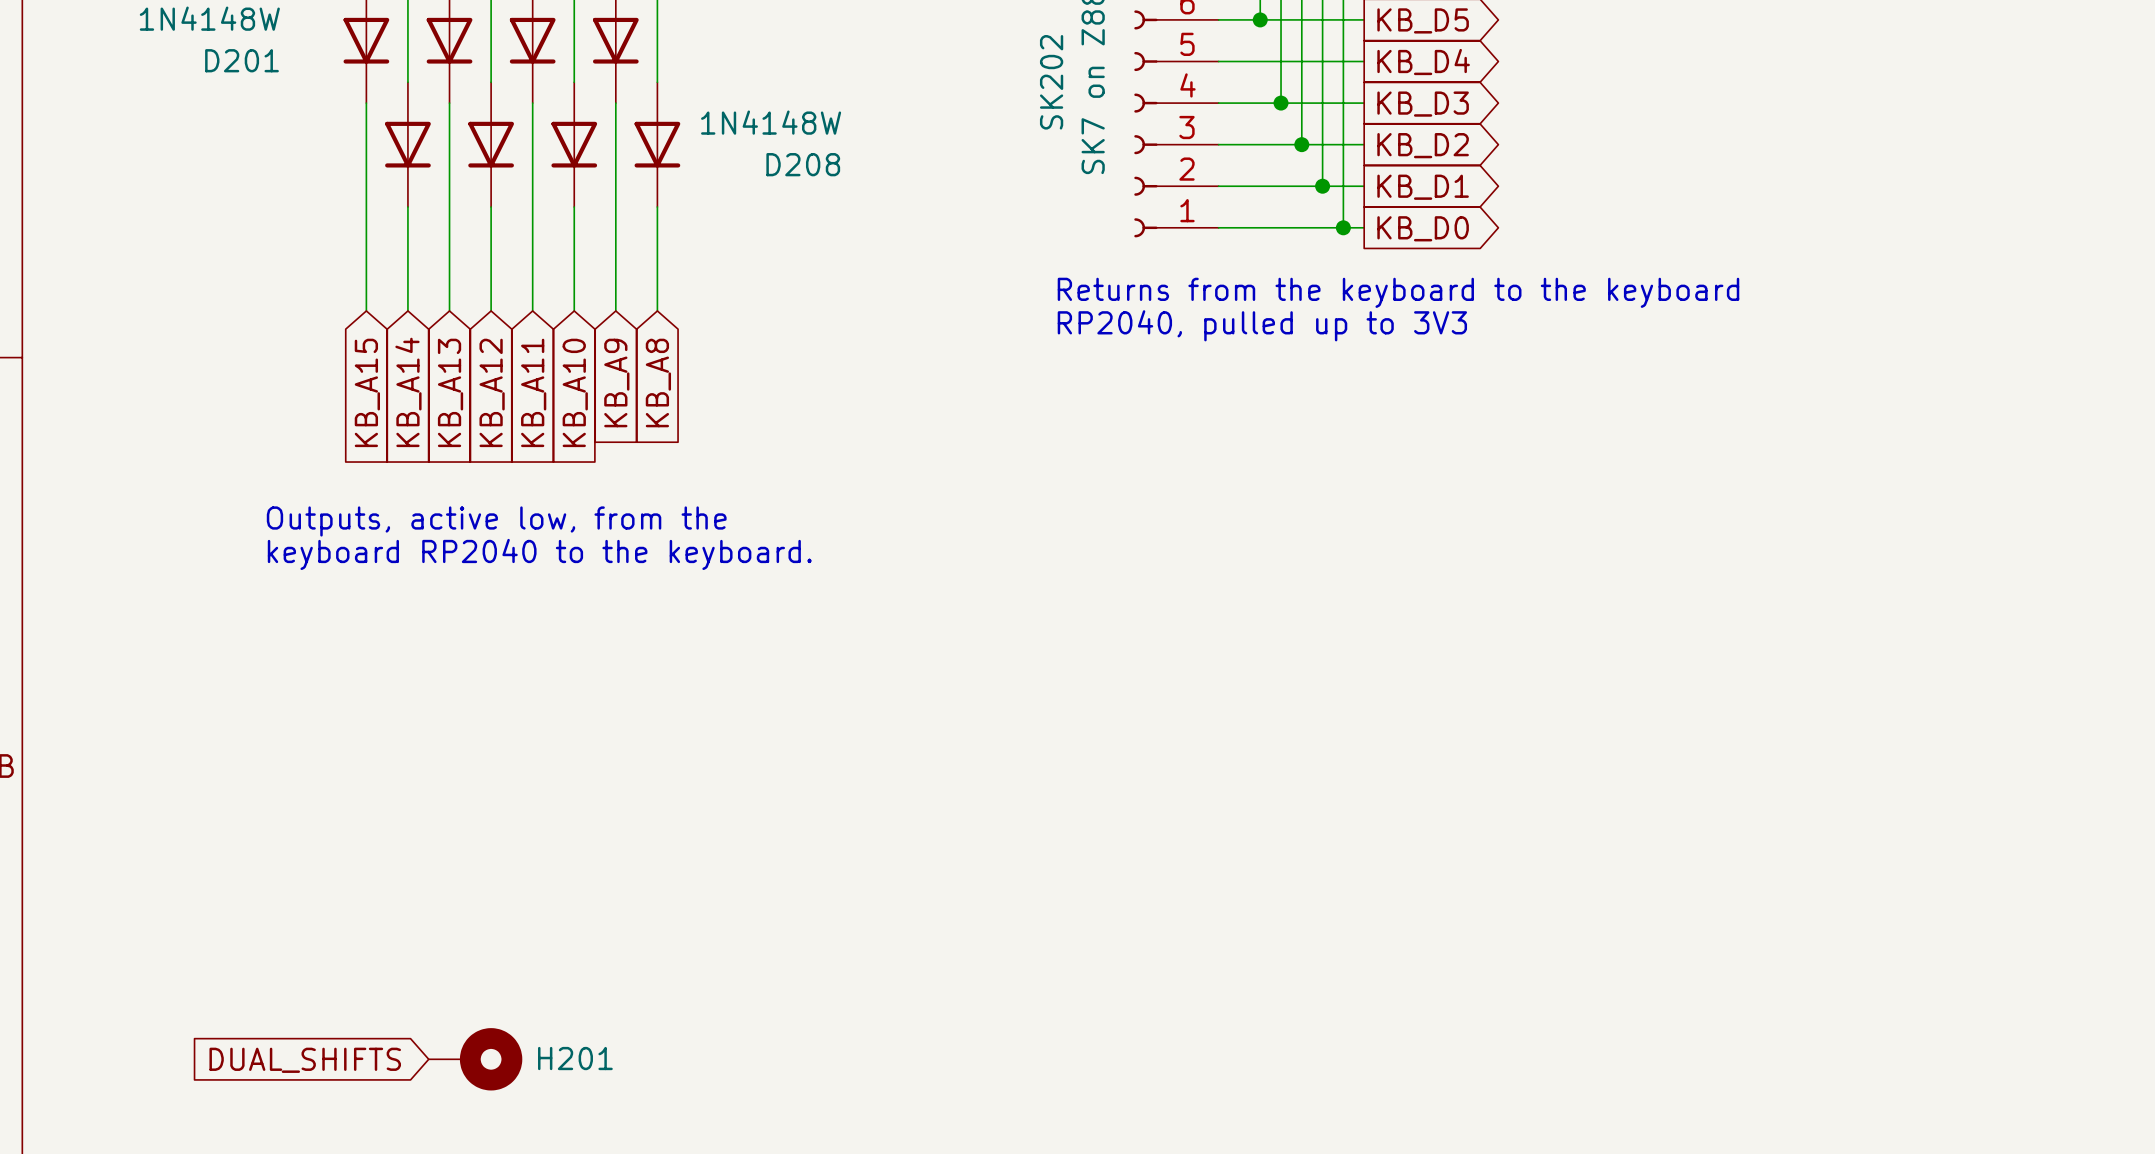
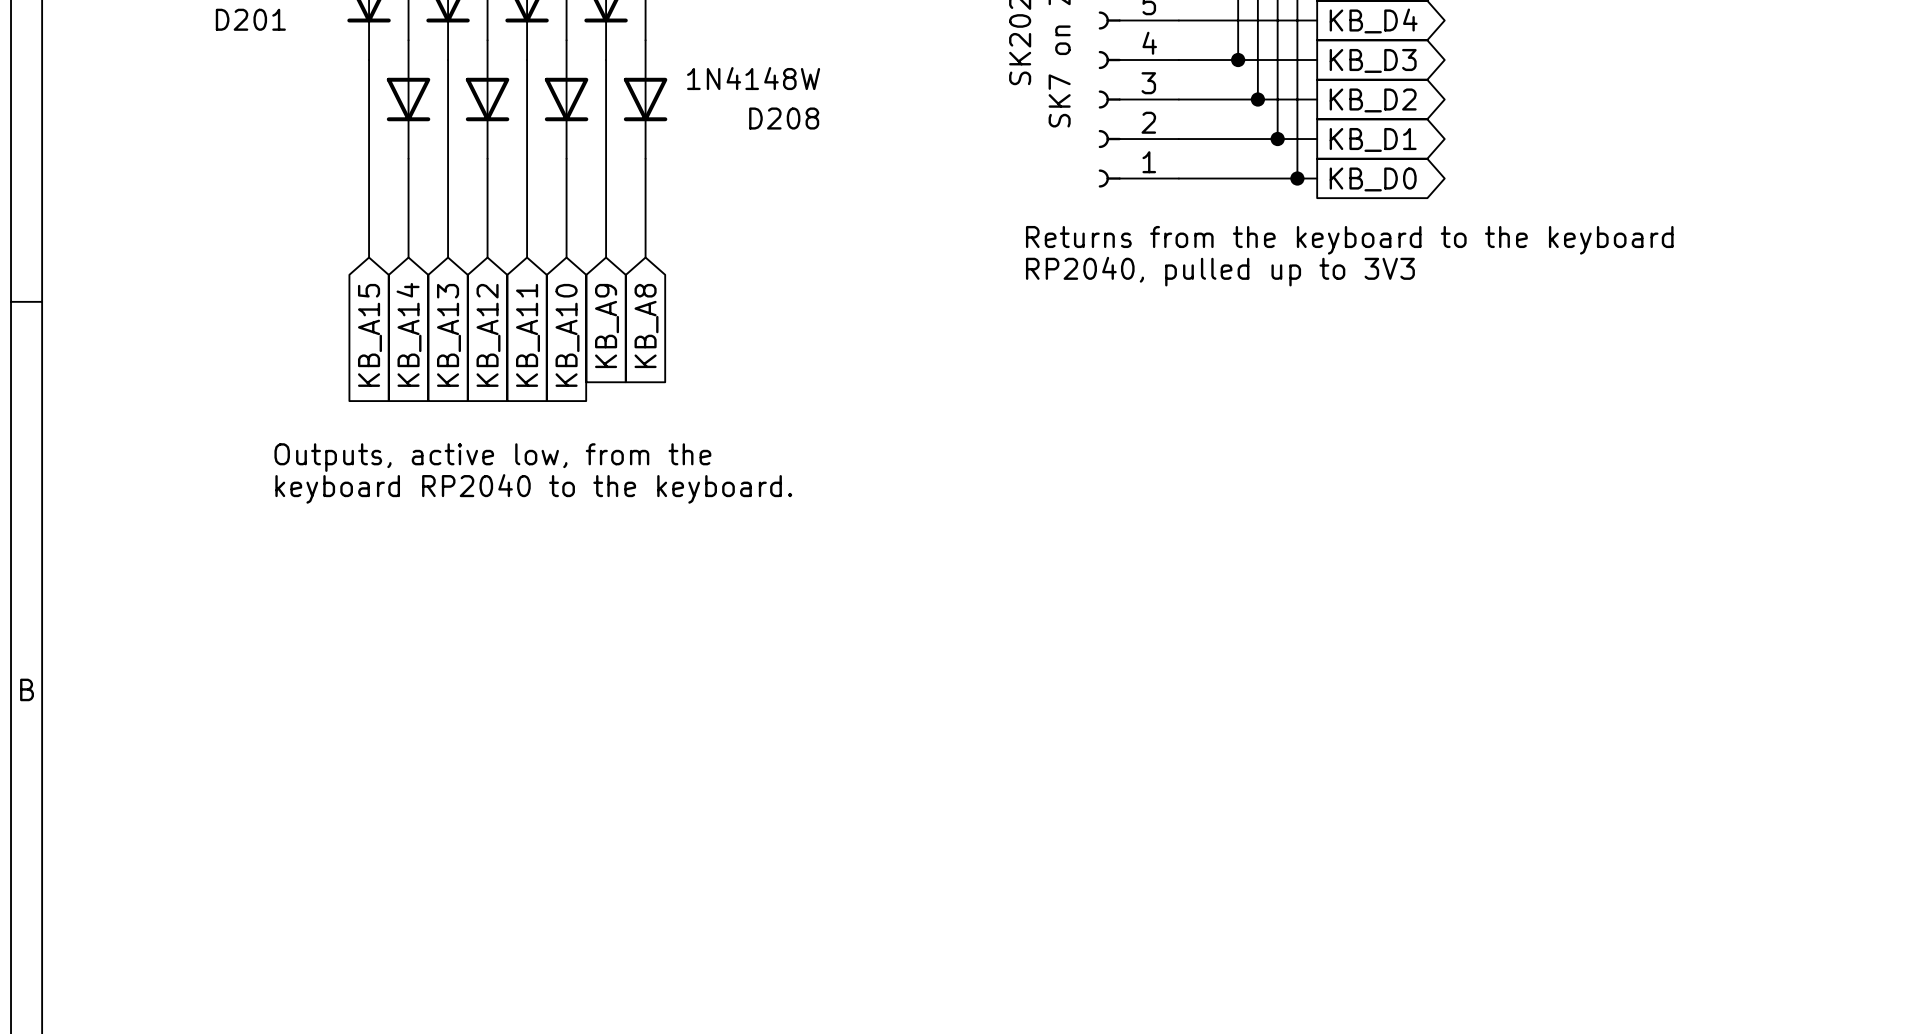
H201: (475, 1059) -> none
global label: DUAL_SHIFTS (305, 1060) -> none

